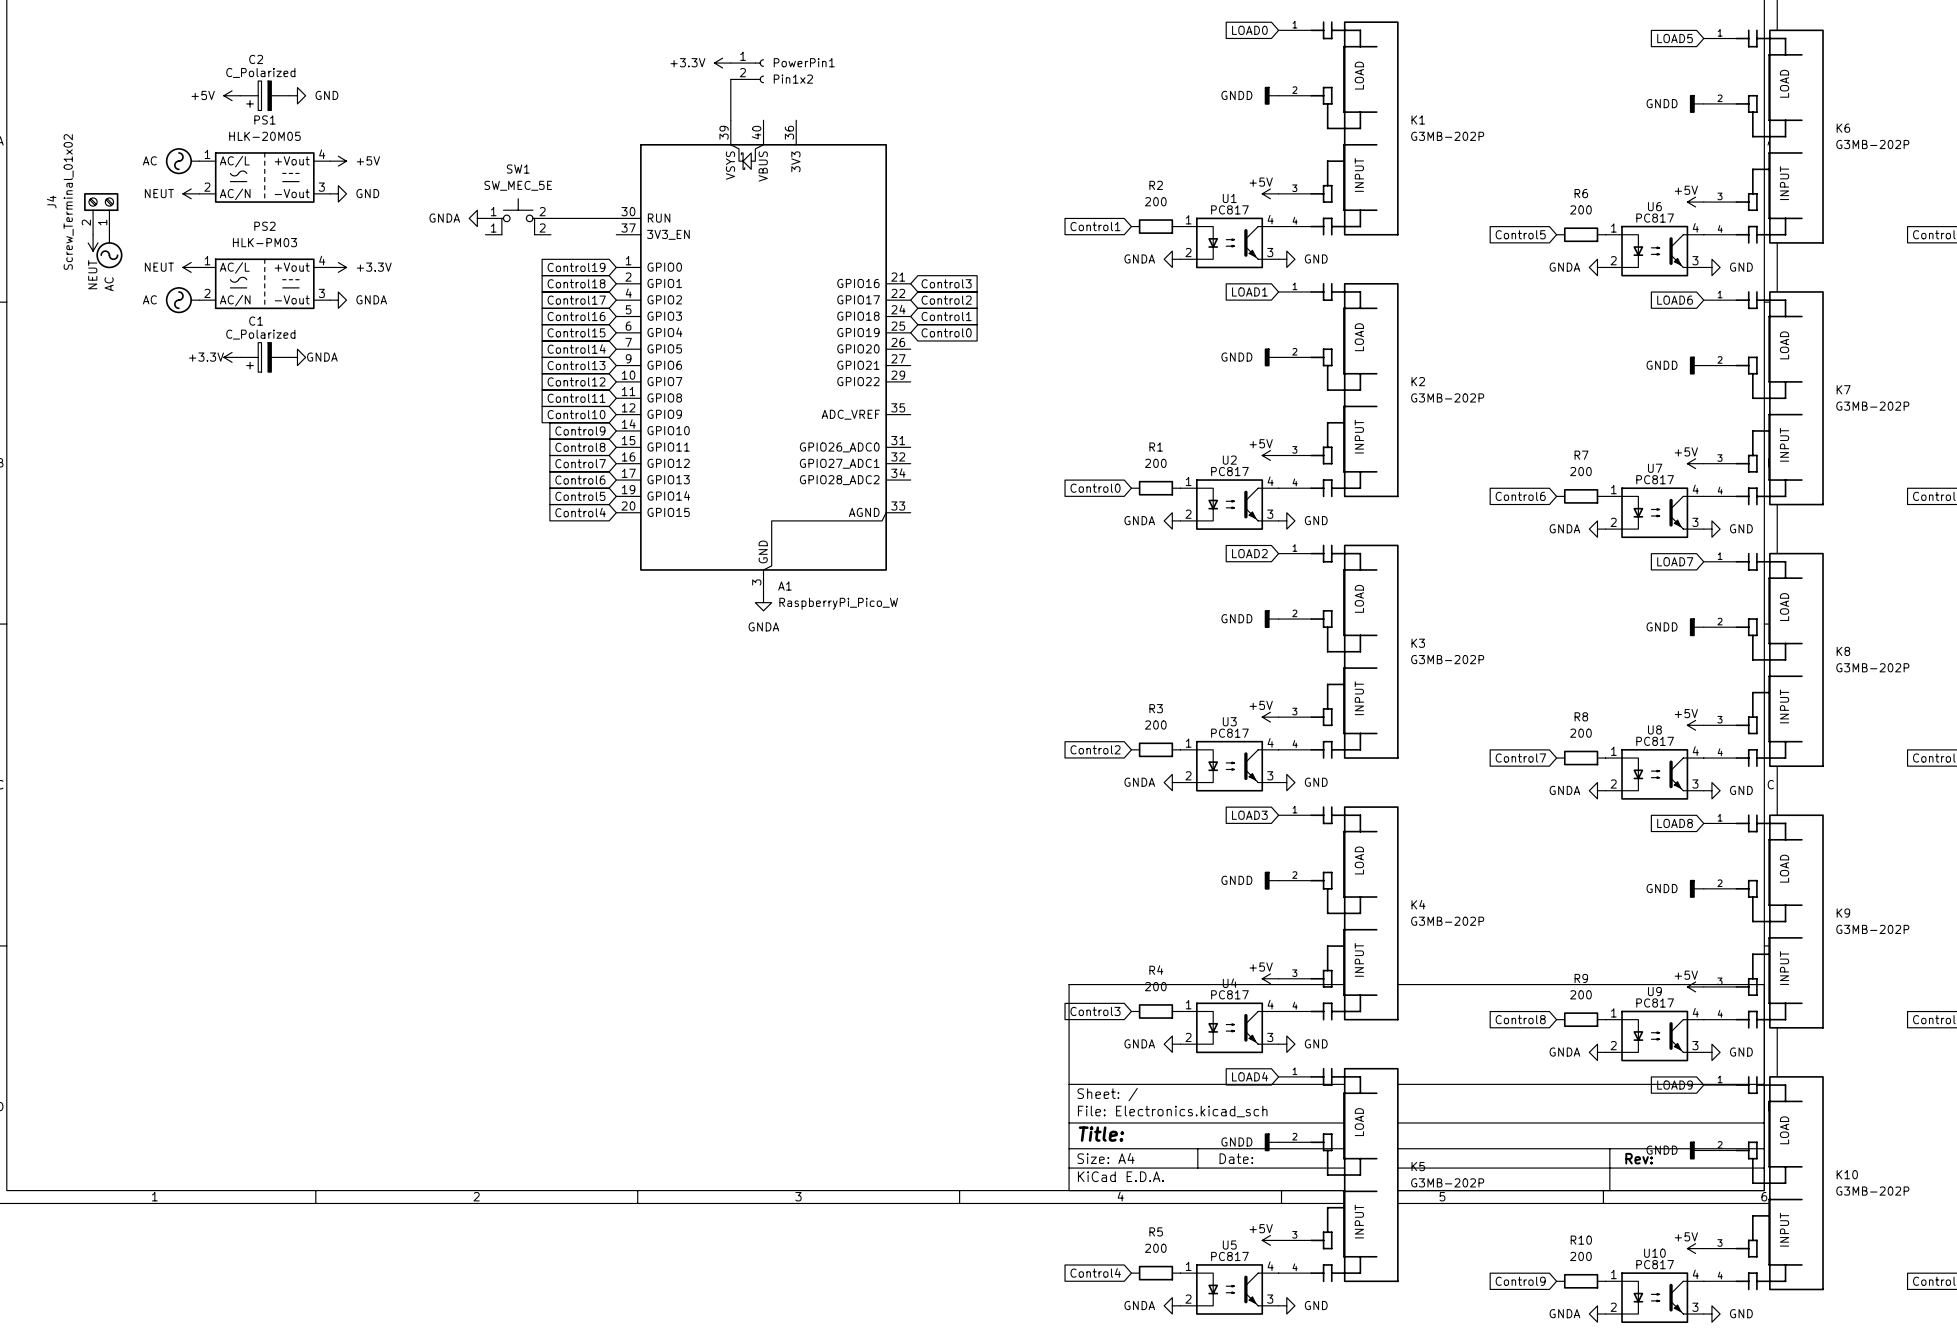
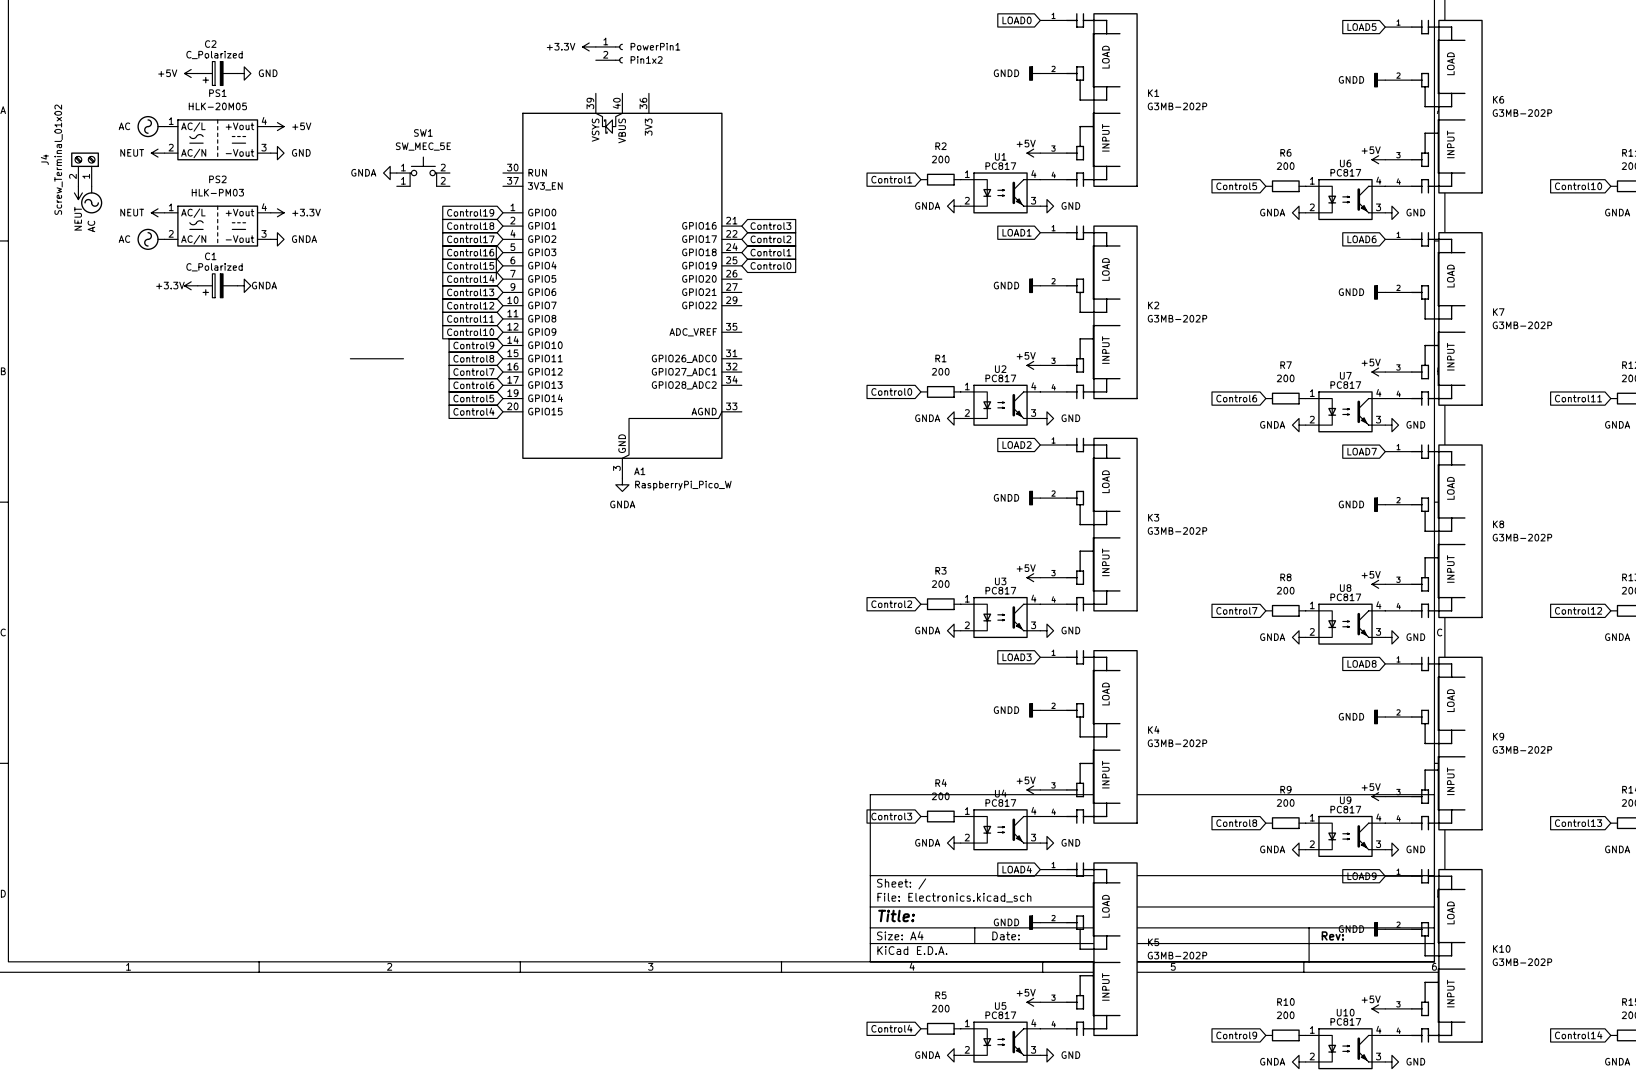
wire: (730, 79) (730, 120) -> none
wire: (550, 218) (616, 218) -> none
wire: none -> (496, 245) (496, 279)
wire: none -> (350, 358) (403, 358)

